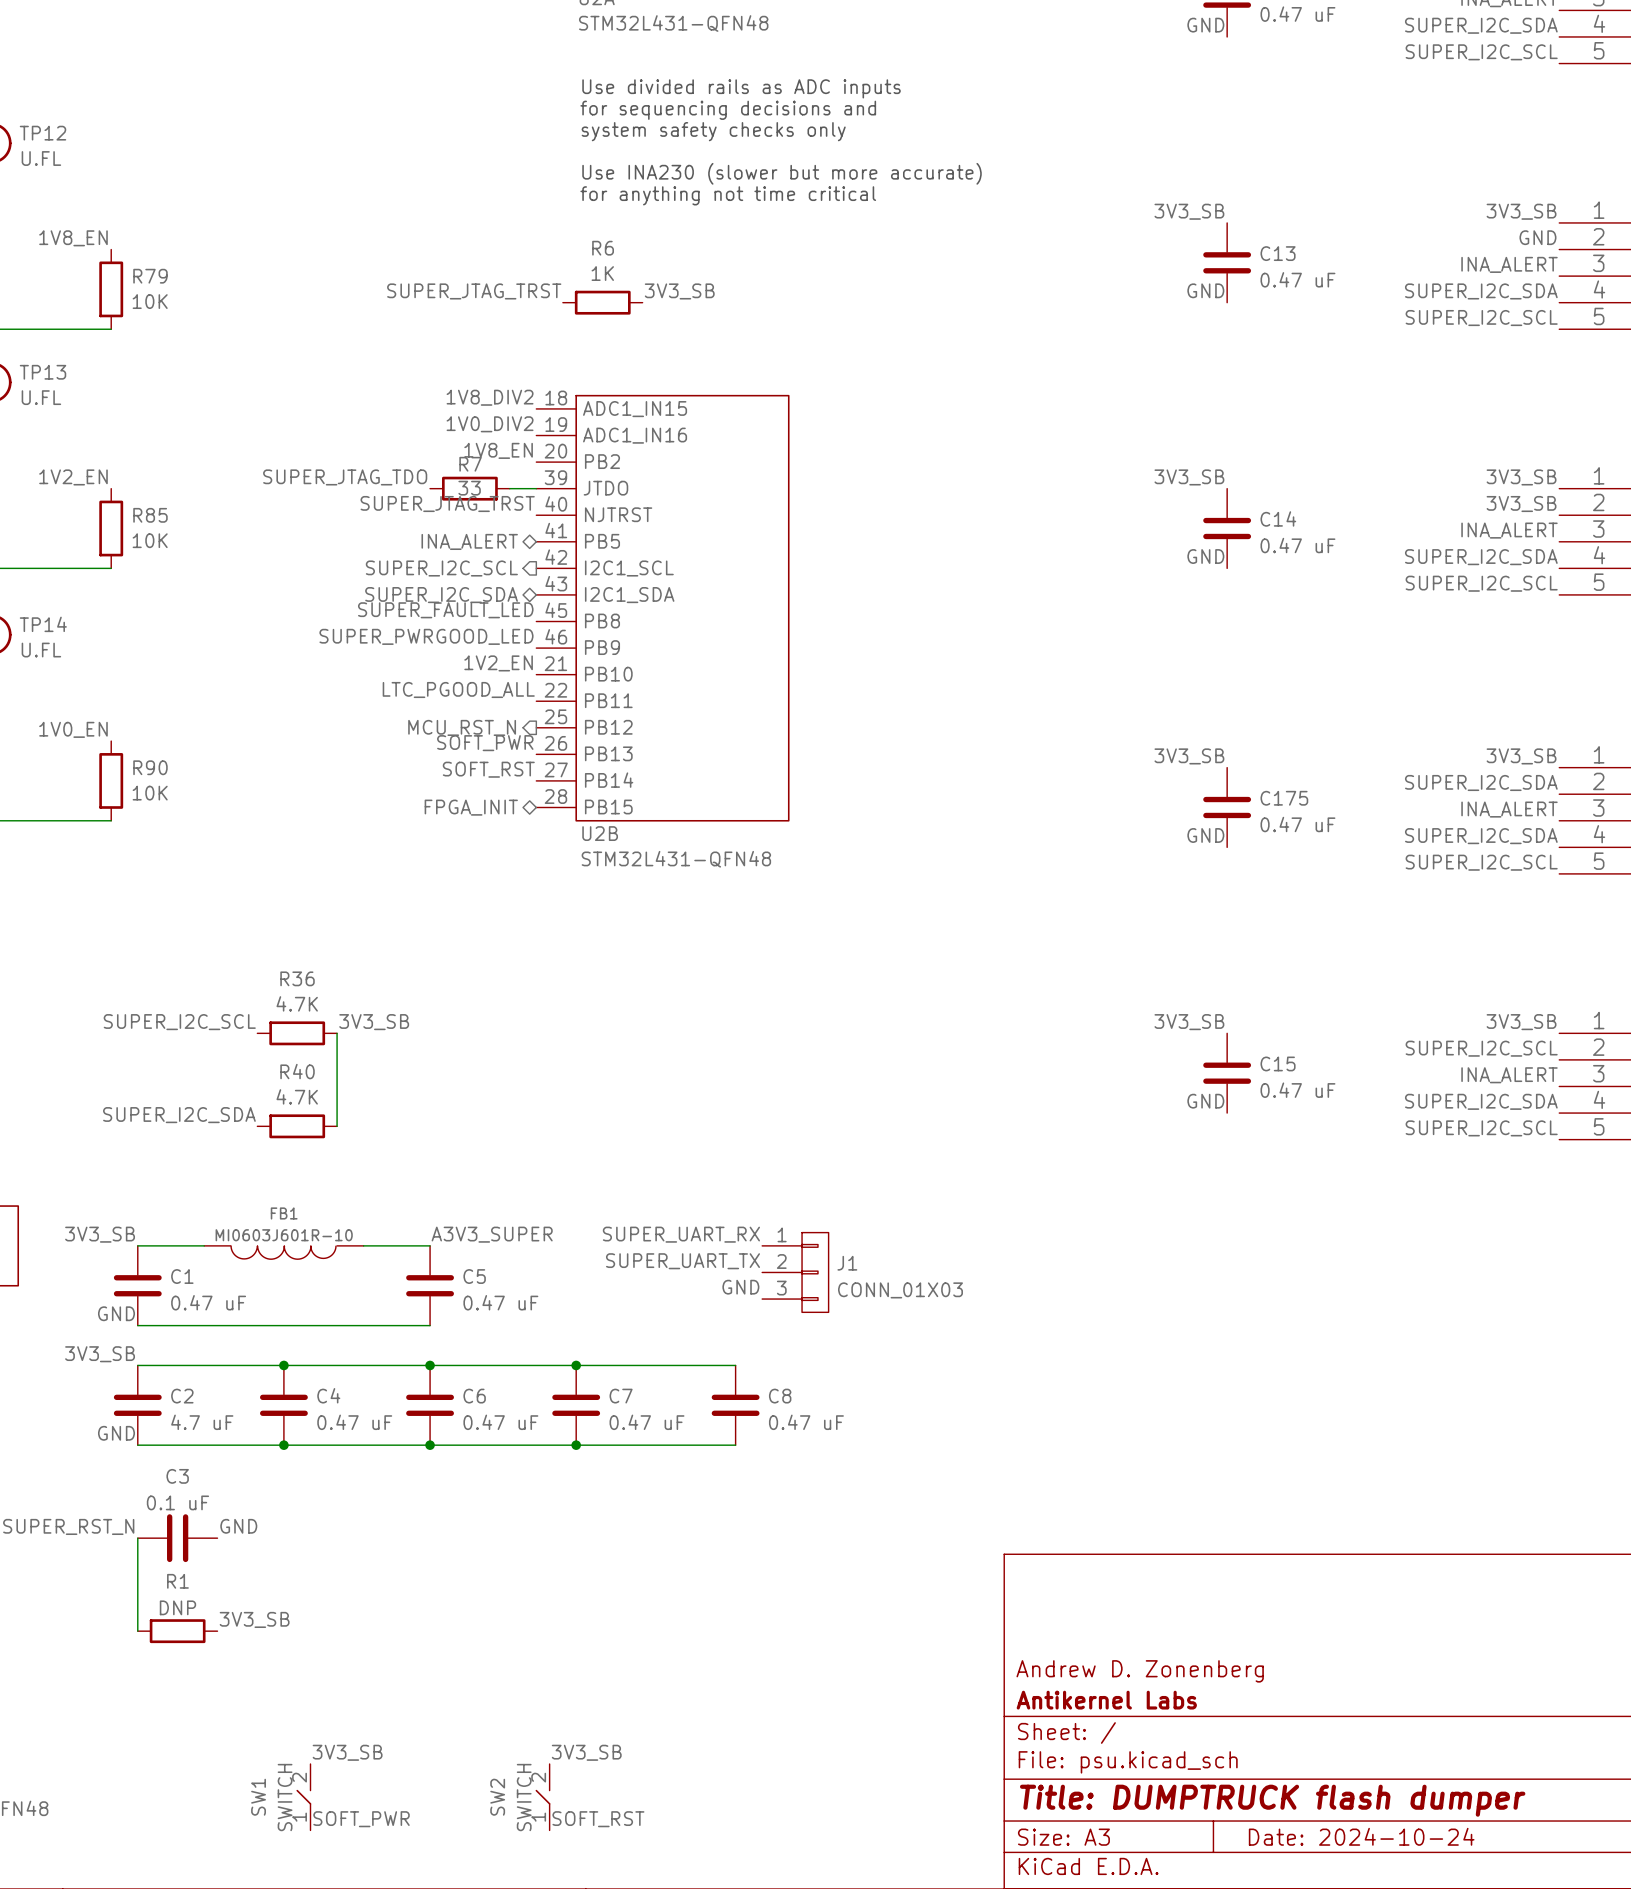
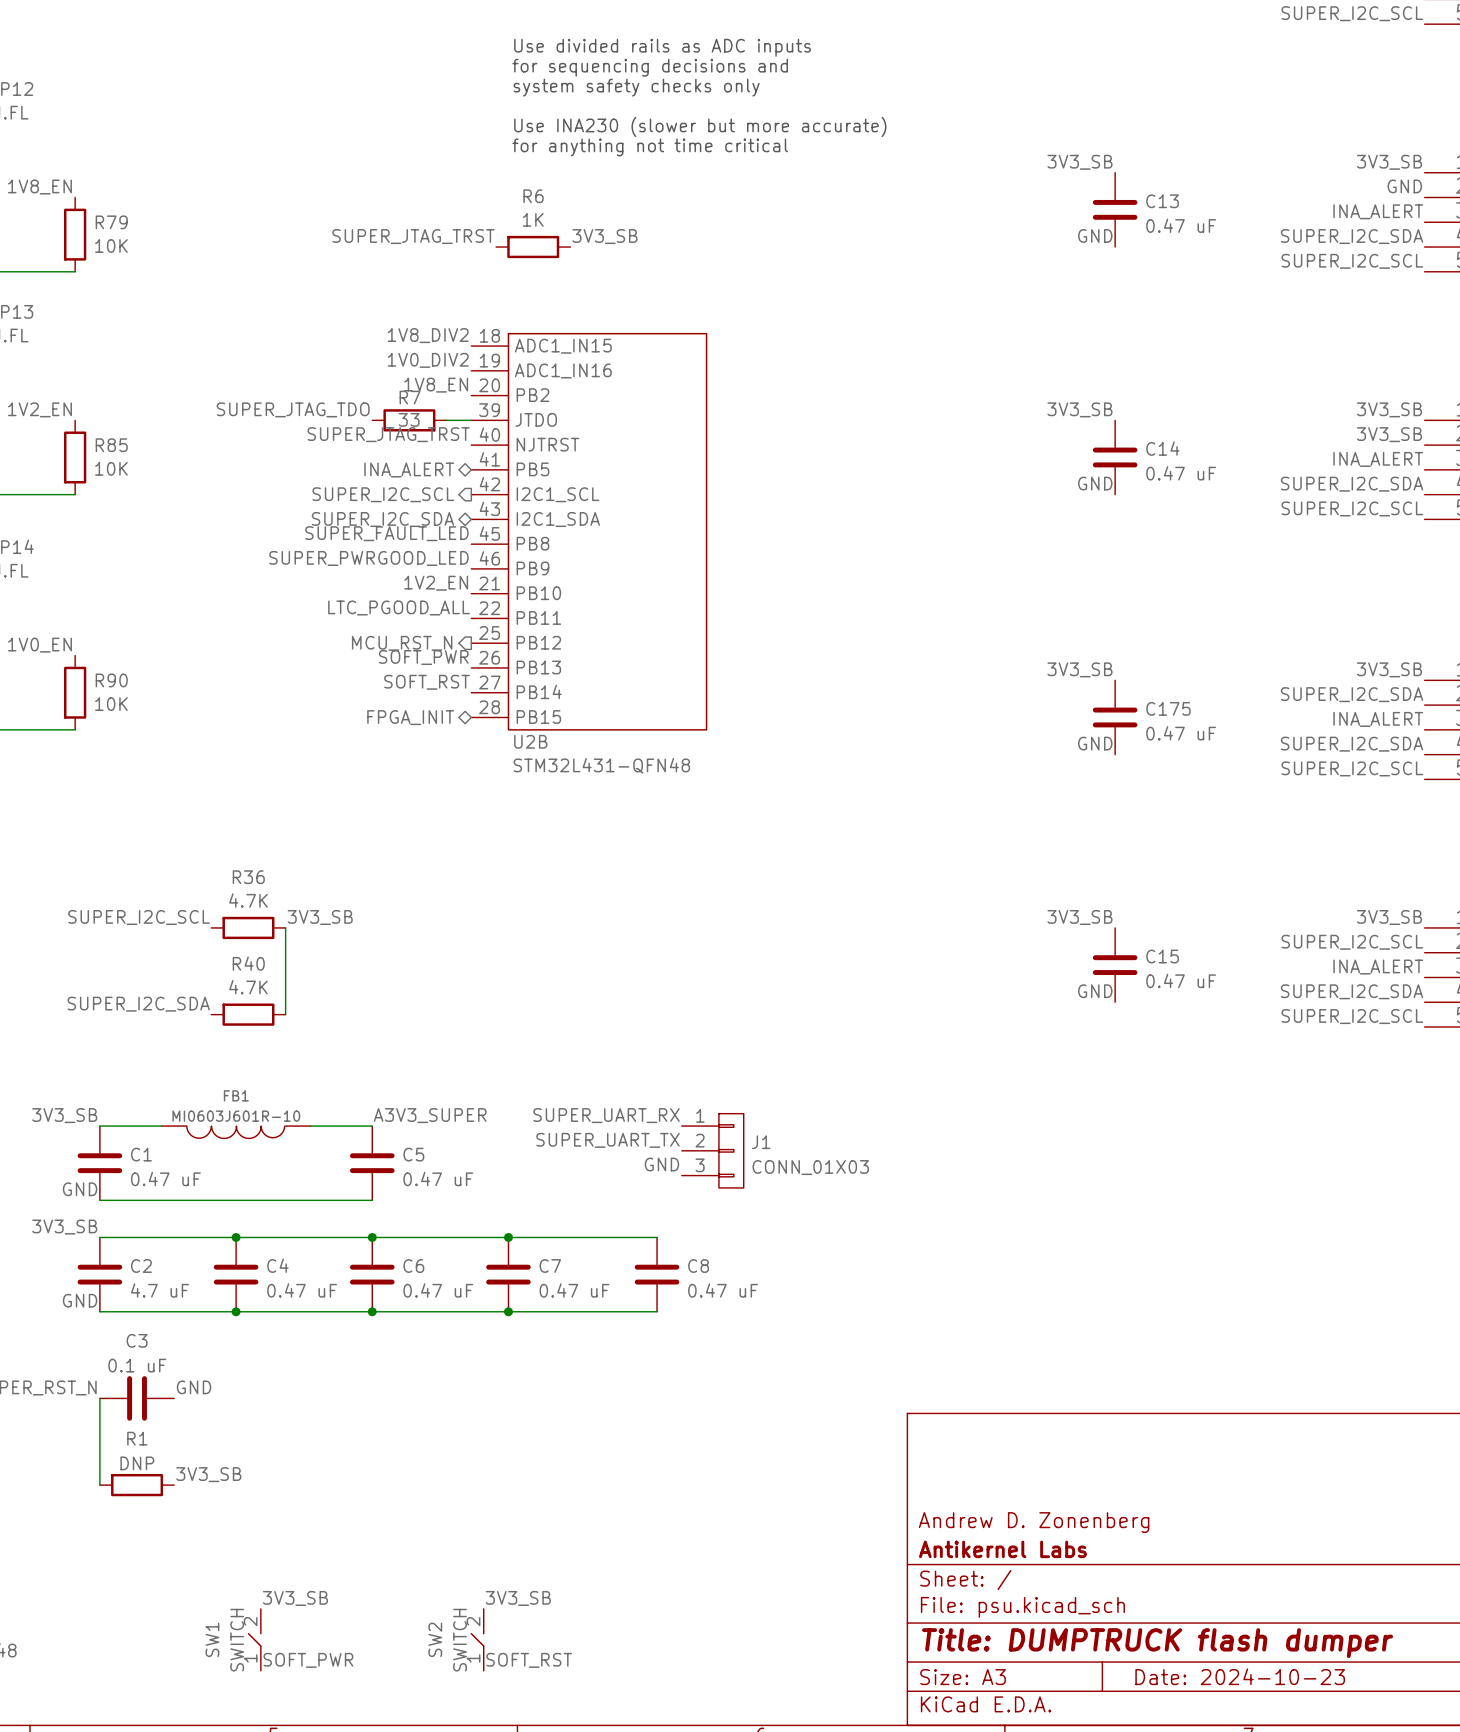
title block: Date: 2024-10-24 (1361, 1836) -> Date: 2024-10-23 (1240, 1676)

